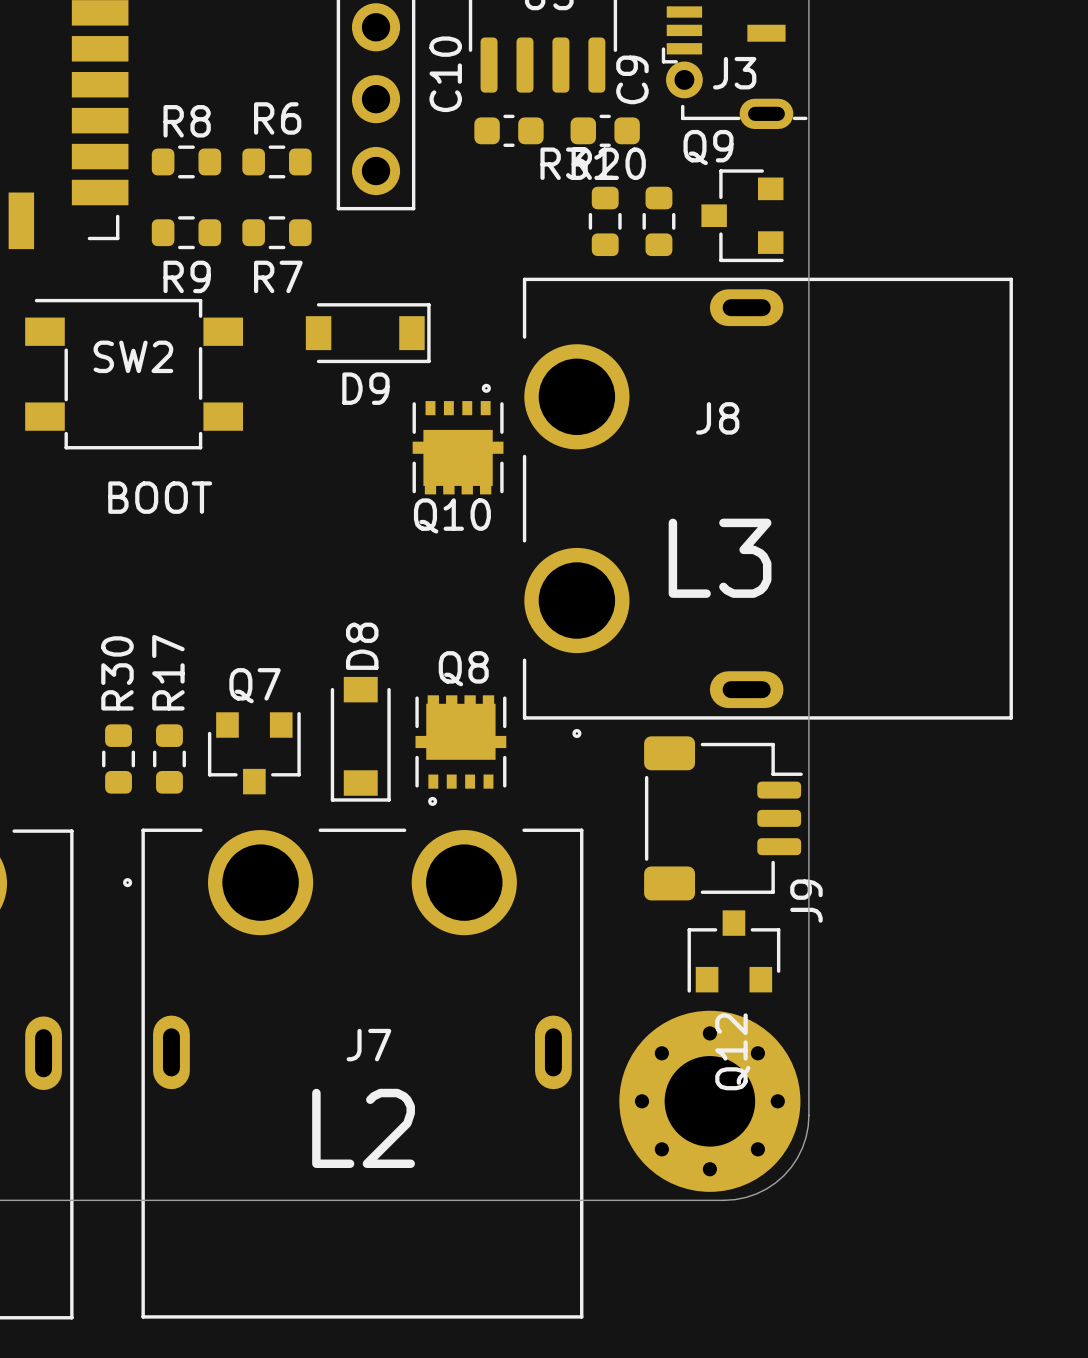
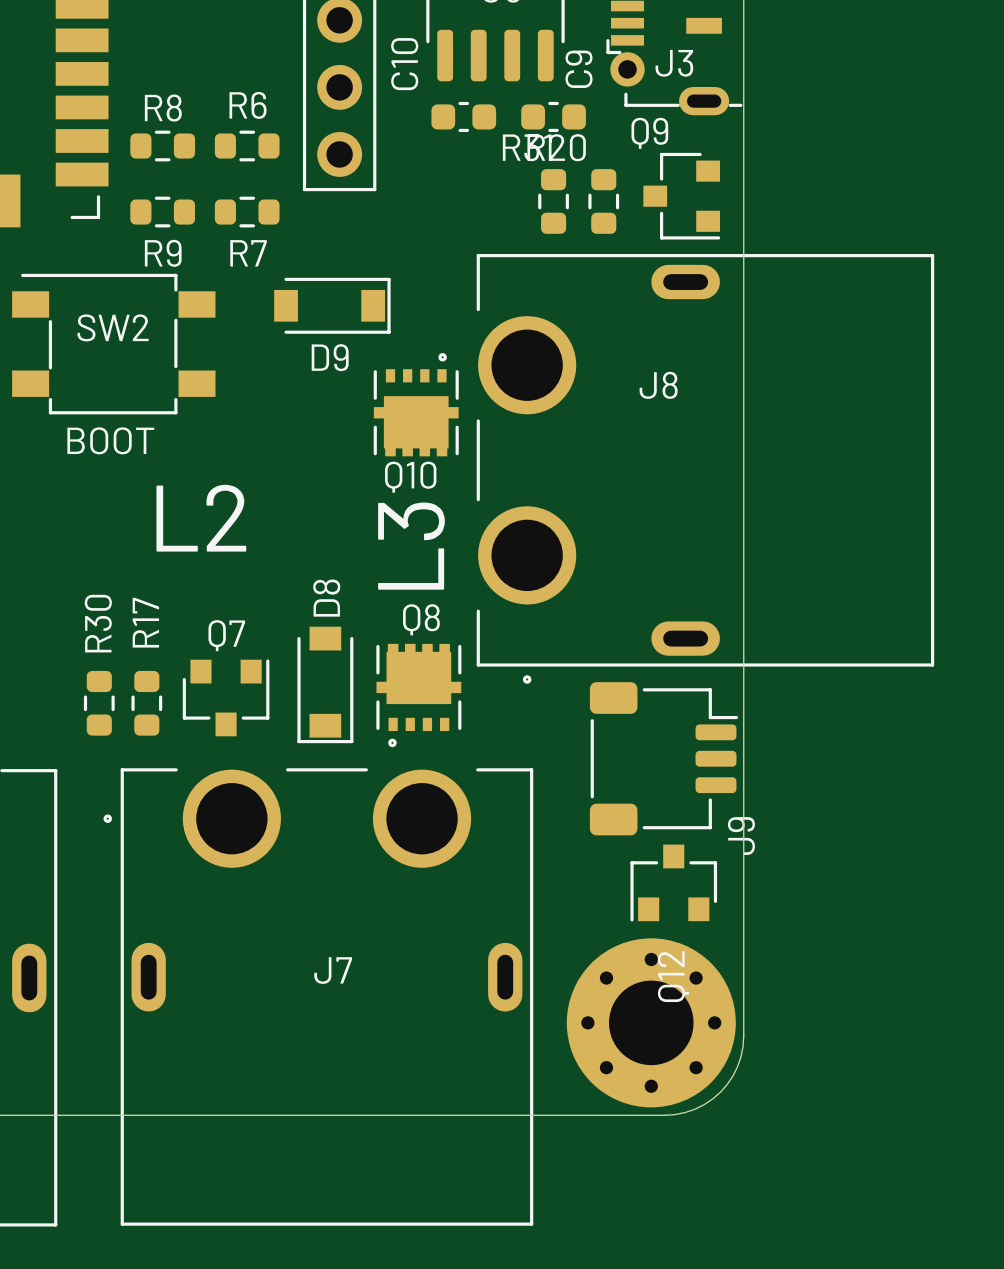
text position: BOOT (160, 497) -> BOOT (110, 440)
text rotation: 0° (720, 558) -> 90° counterclockwise (411, 546)
text position: L3 (720, 558) -> L3 (411, 546)
text position: L2 (363, 1128) -> L2 (201, 518)

